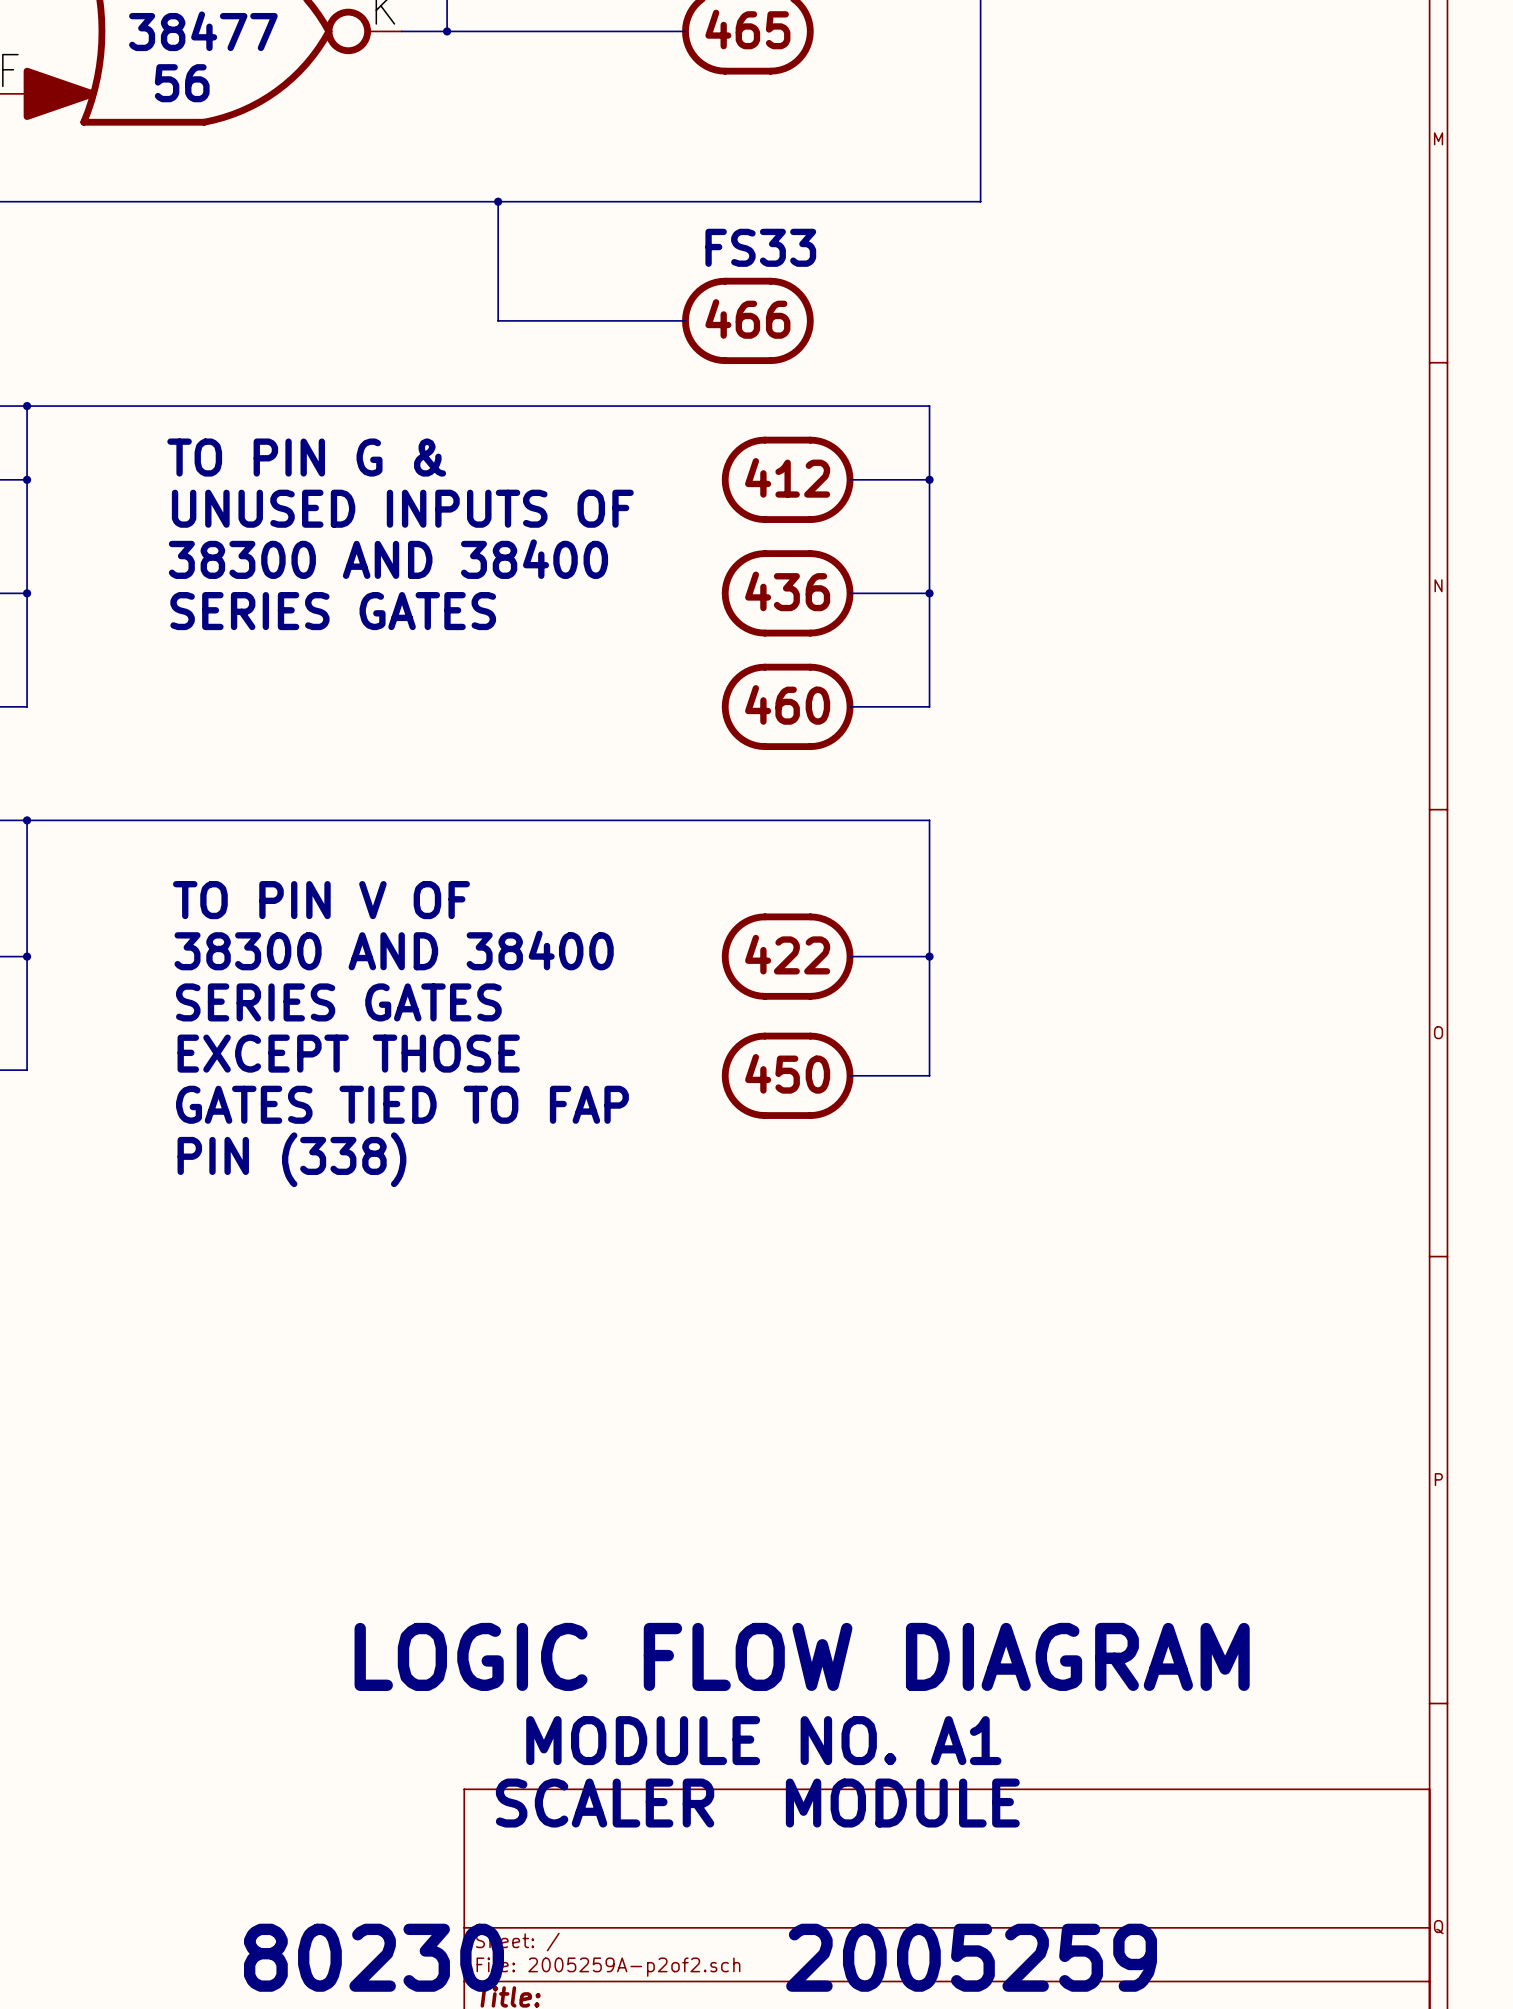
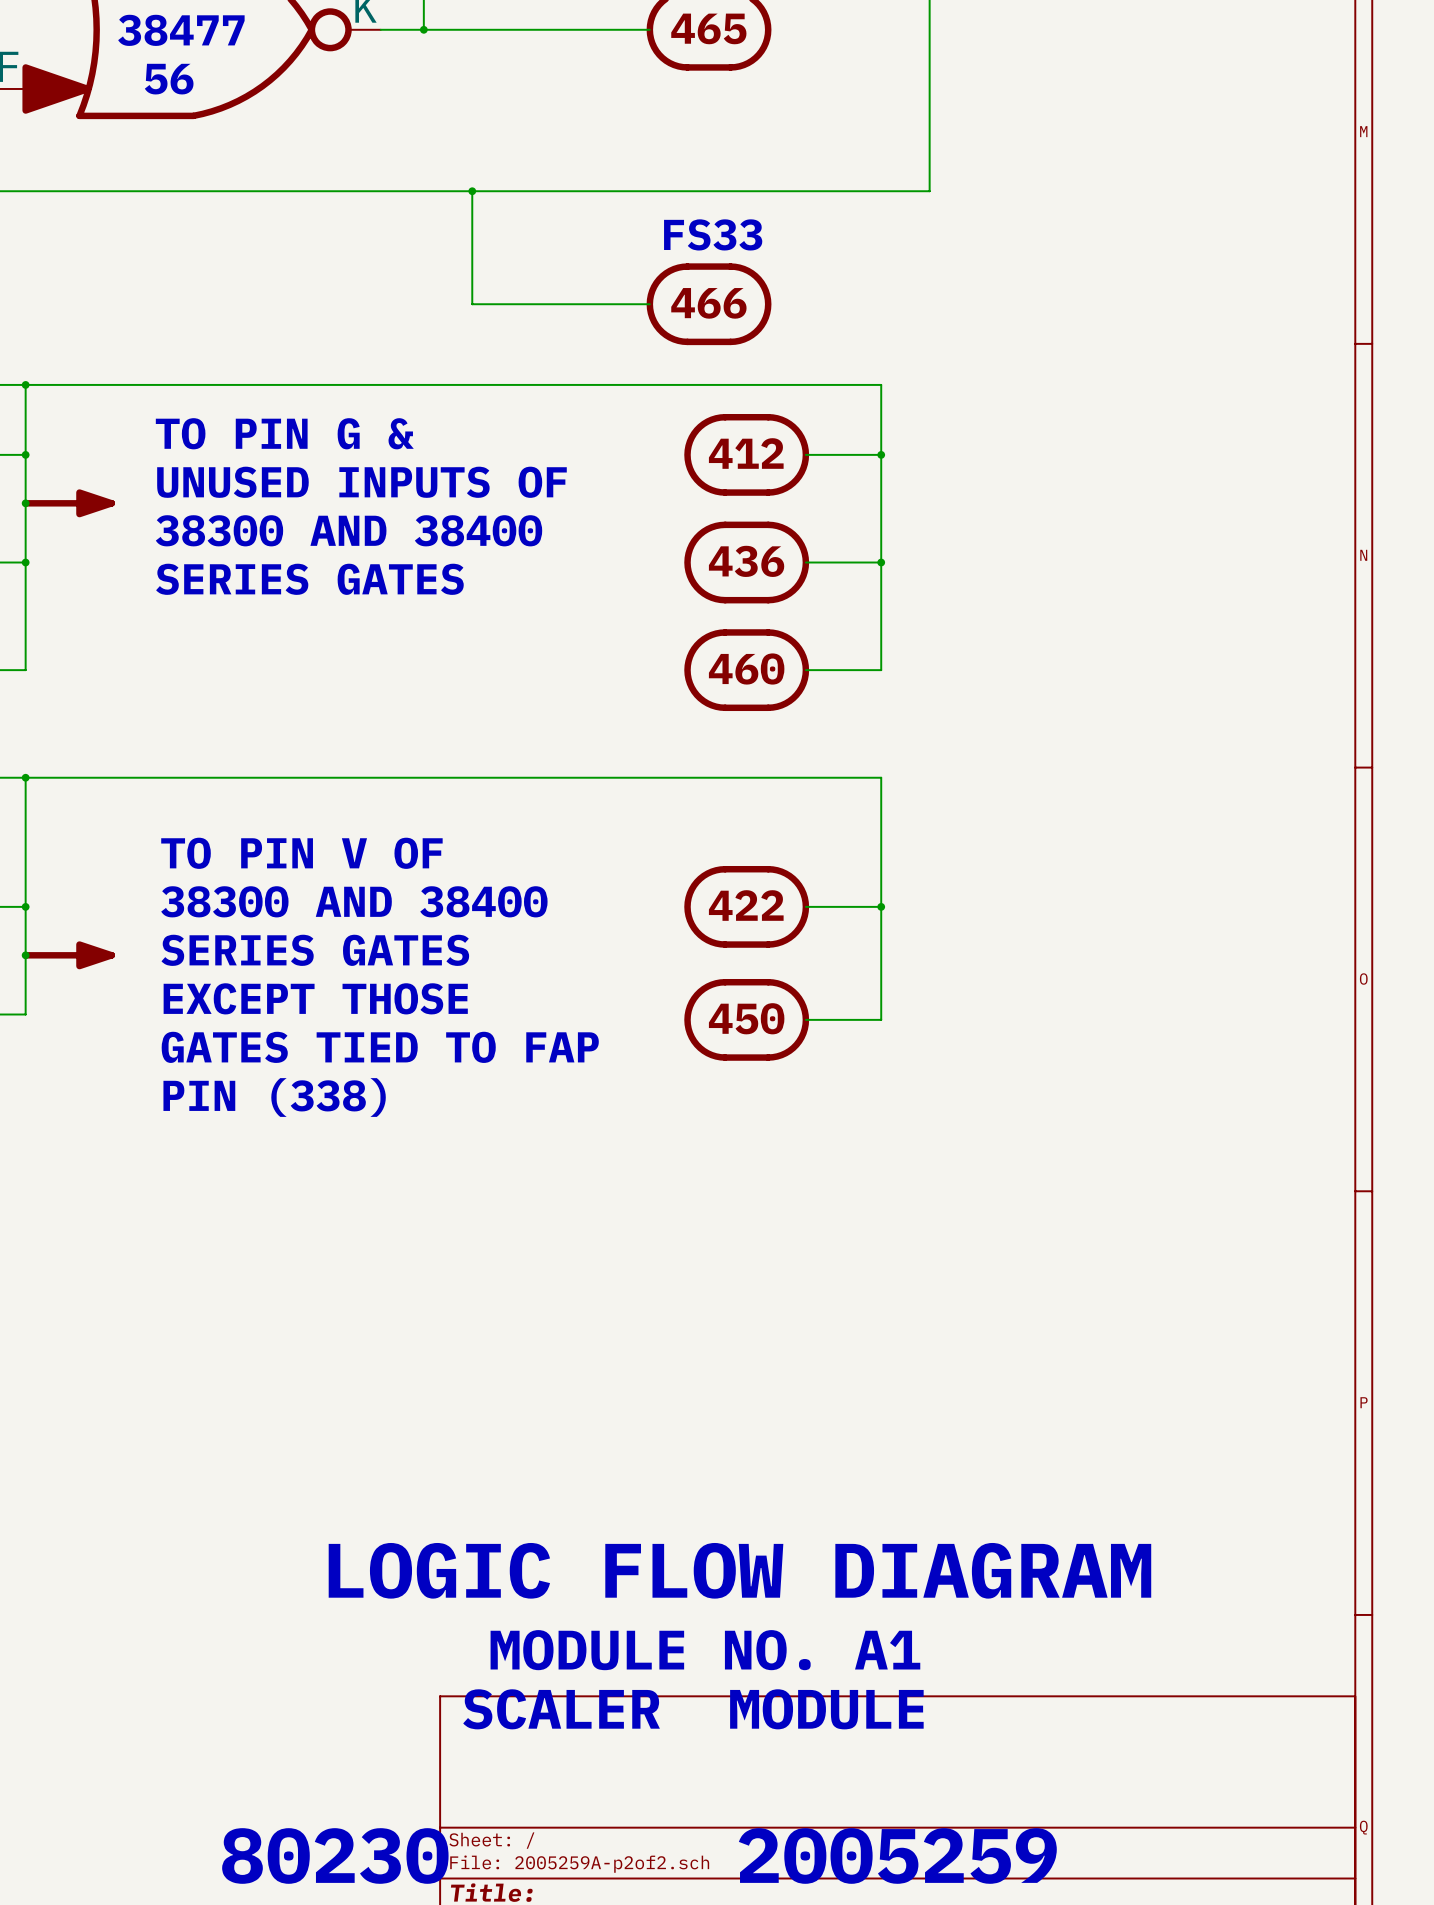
junction: none -> (25, 503)
power symbol: none -> (68, 503)
junction: none -> (25, 955)
power symbol: none -> (68, 955)

